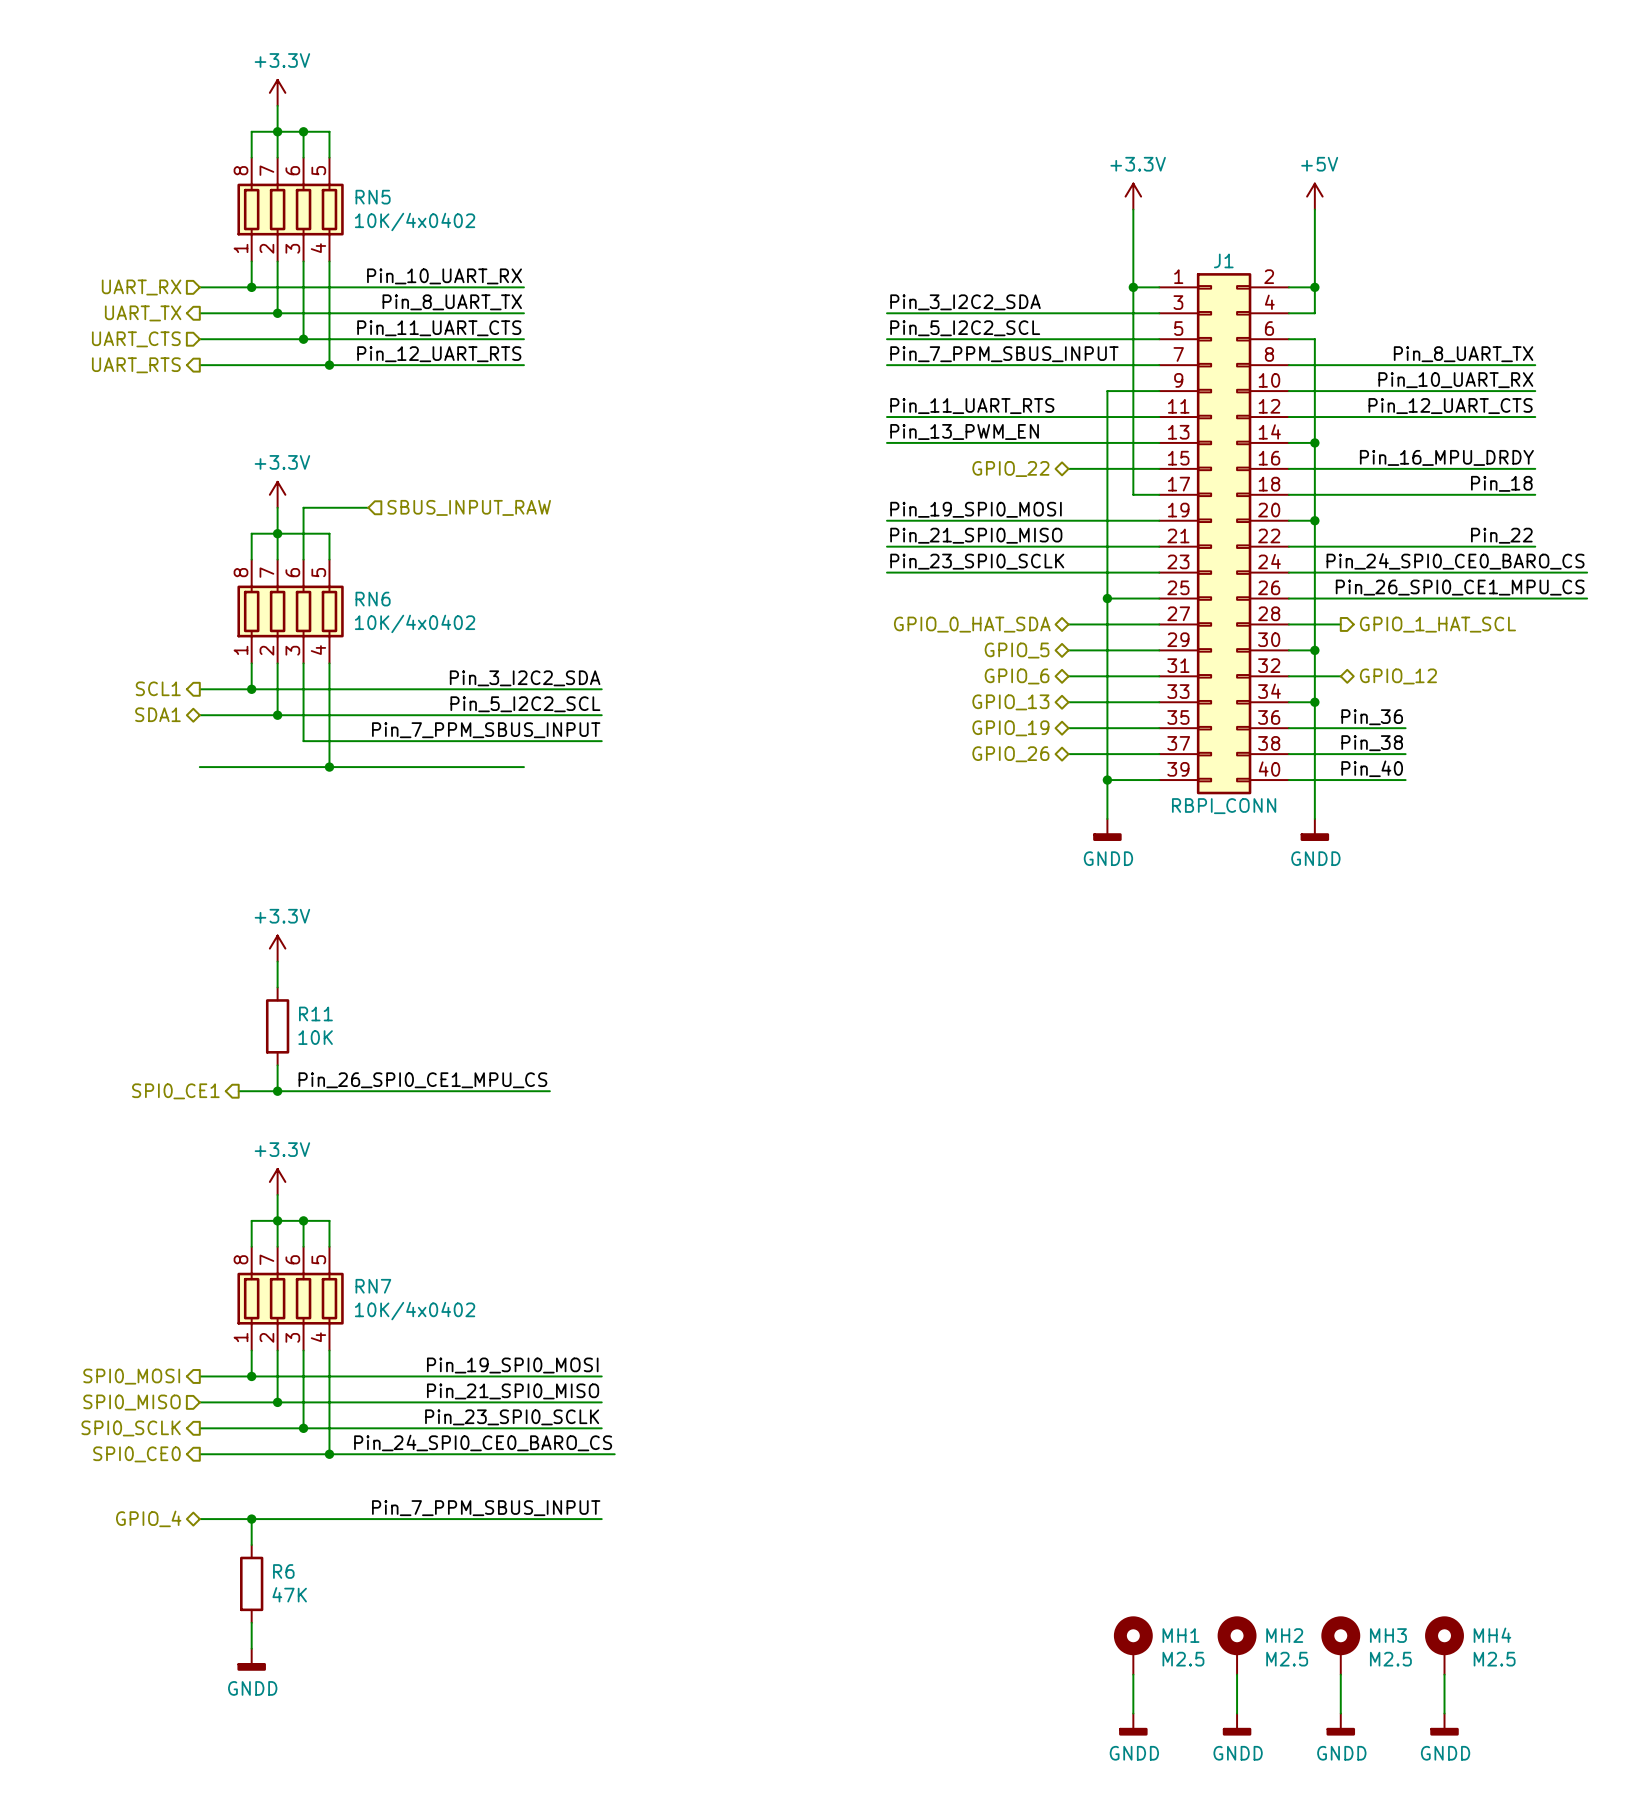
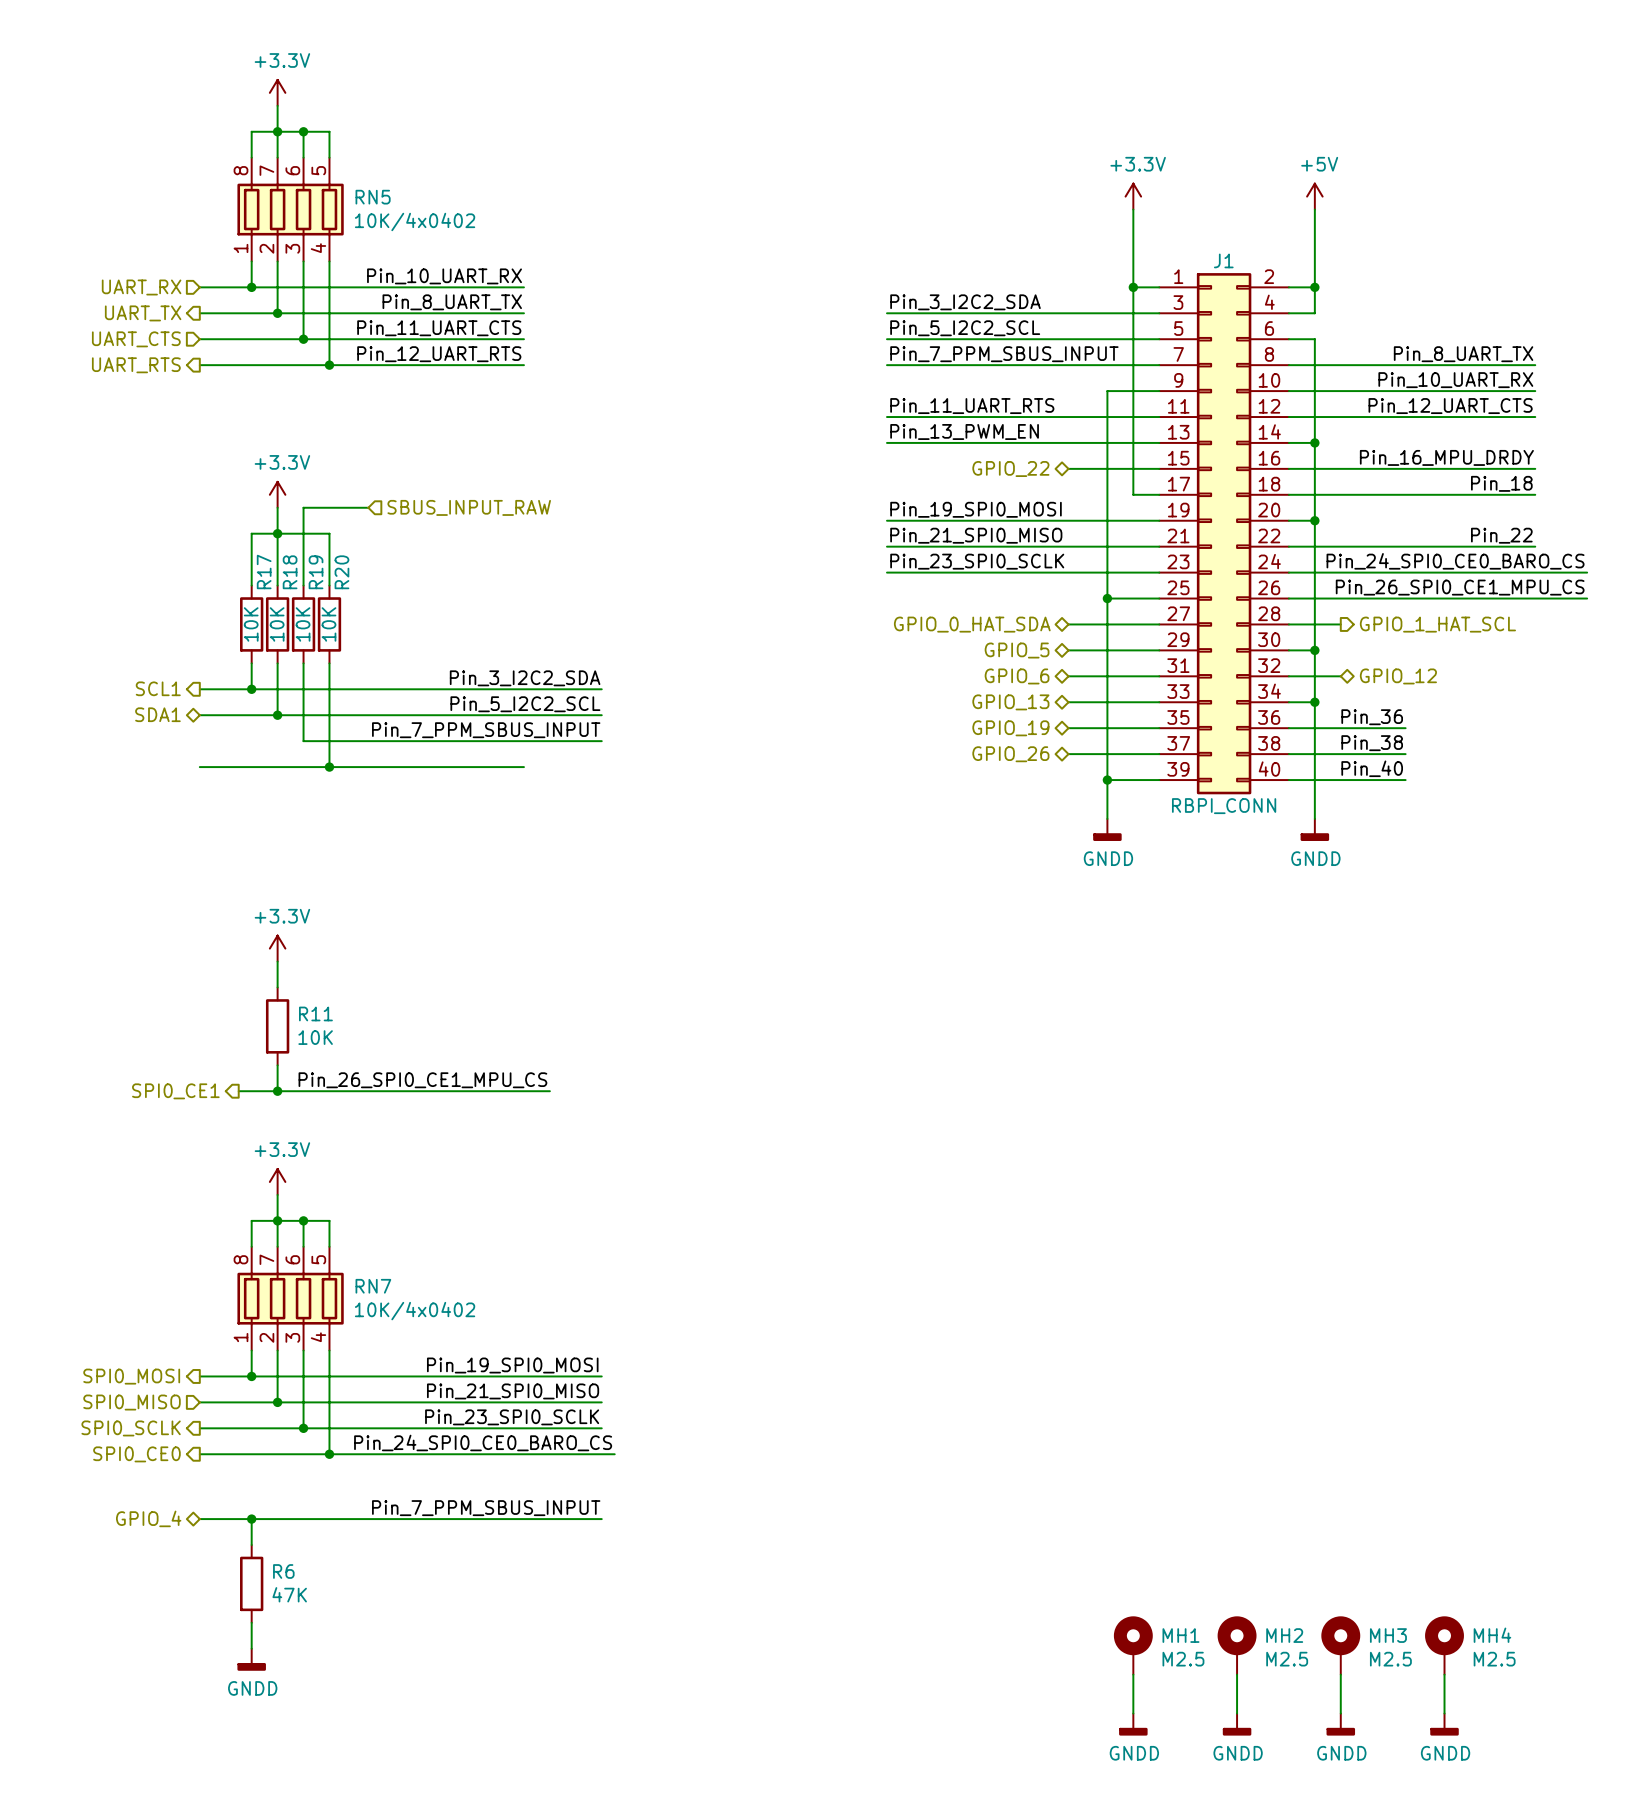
RN6: 10K/4x0402 (290, 611) -> none
R17: none -> 10K (251, 624)
R18: none -> 10K (277, 624)
R19: none -> 10K (303, 624)
R20: none -> 10K (329, 624)

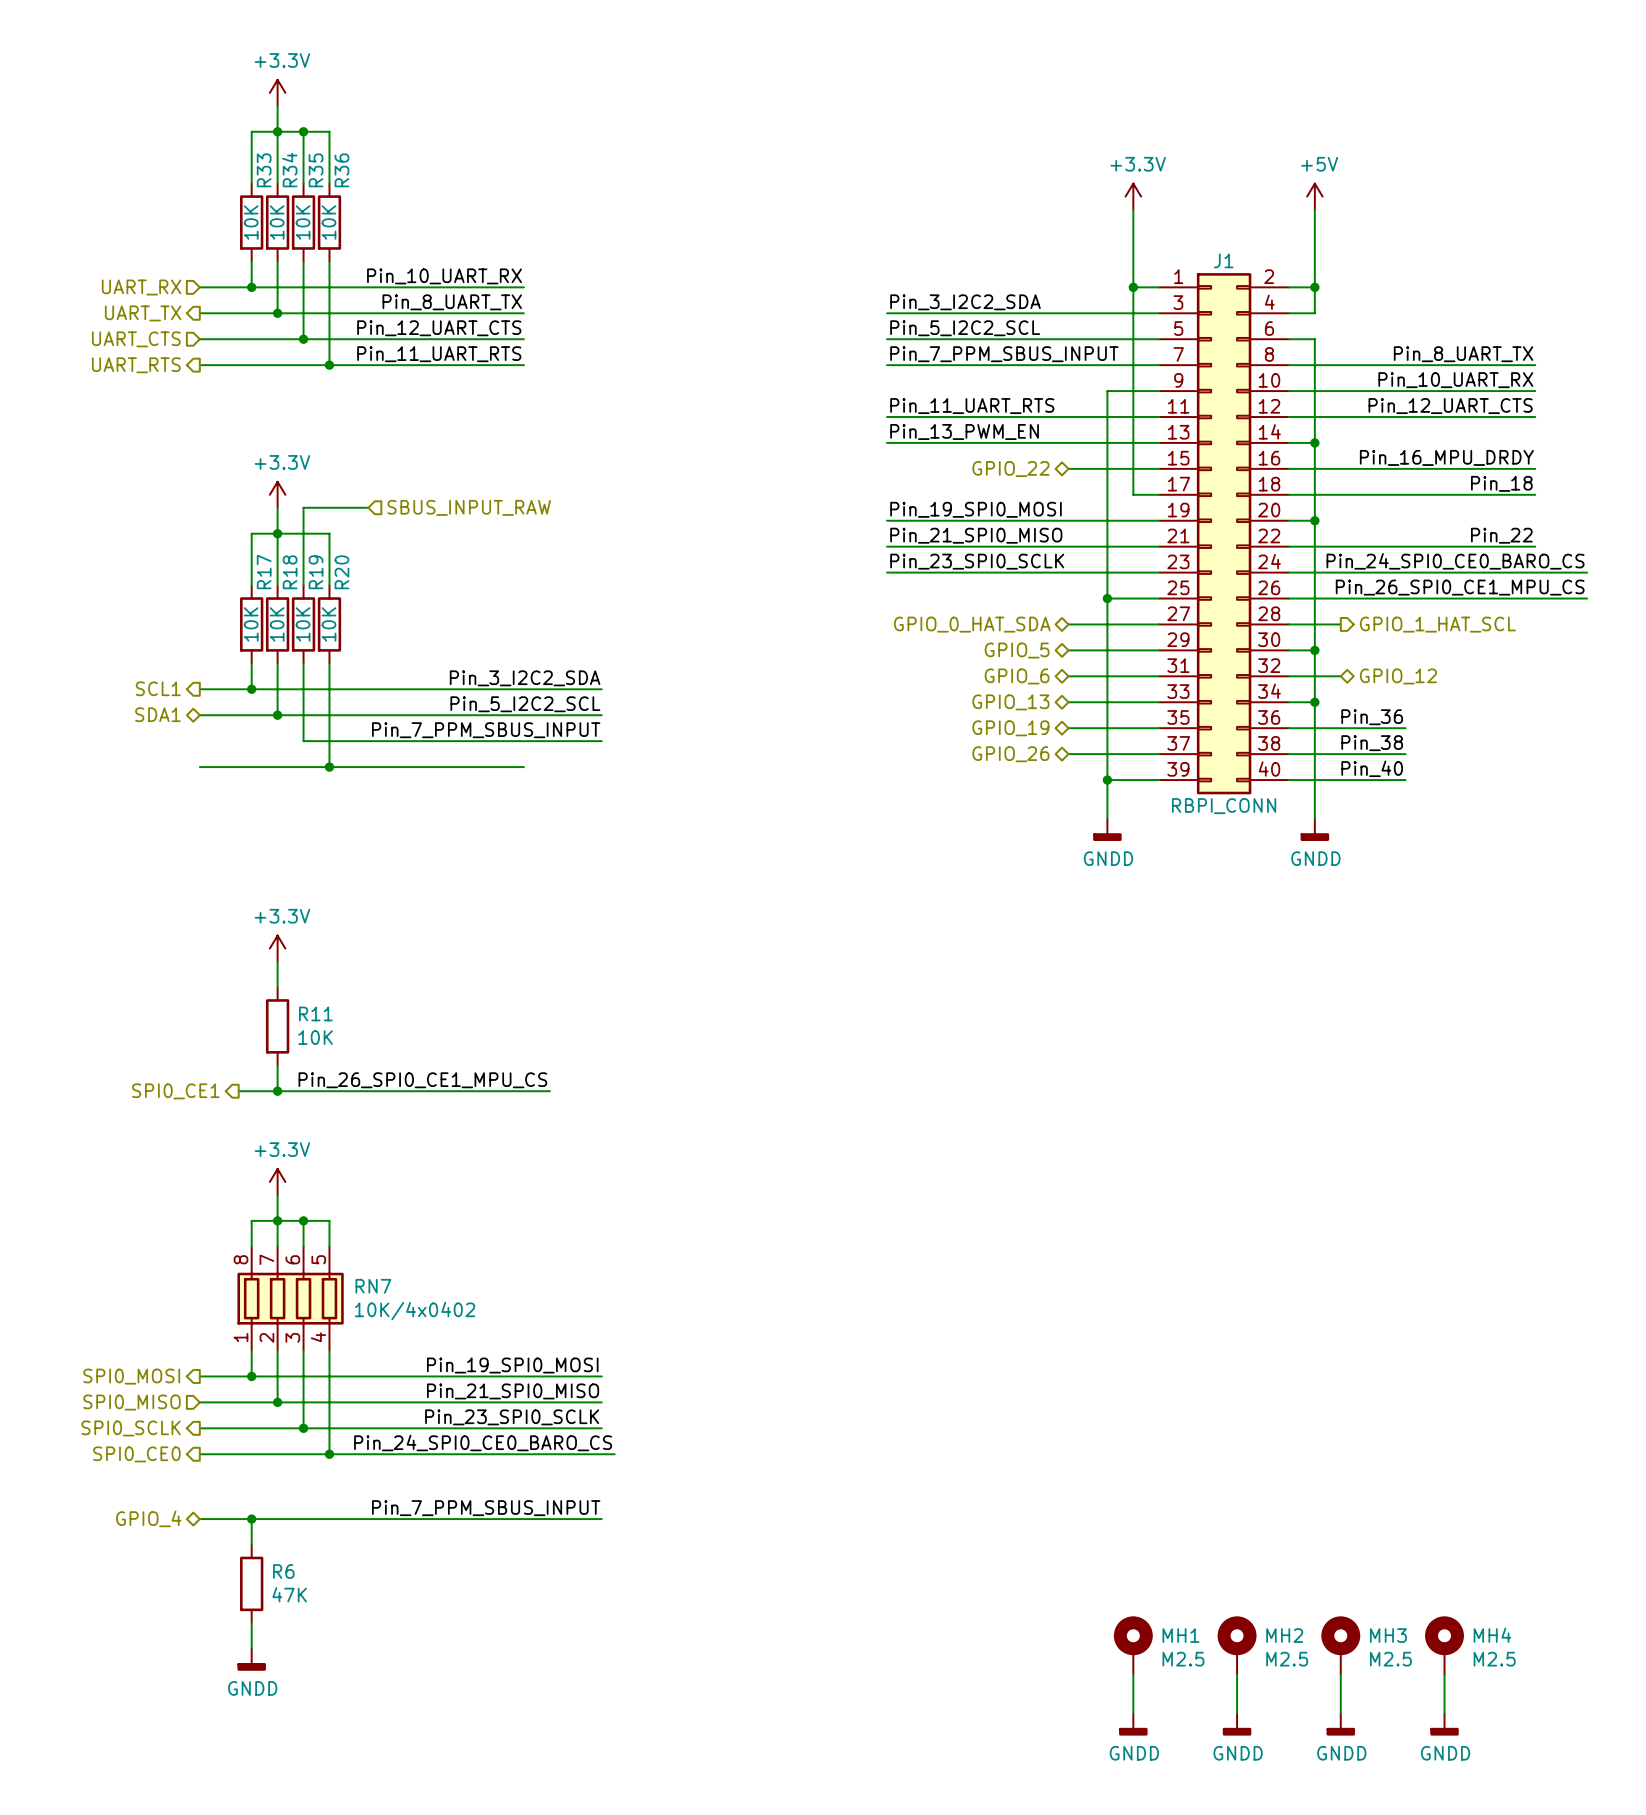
RN5: 10K/4x0402 (290, 209) -> none
R33: none -> 10K (251, 222)
R34: none -> 10K (277, 222)
R35: none -> 10K (303, 222)
R36: none -> 10K (329, 222)
label: Pin_11_UART_CTS (439, 328) -> Pin_12_UART_CTS (439, 328)
label: Pin_12_UART_RTS (439, 354) -> Pin_11_UART_RTS (439, 354)

